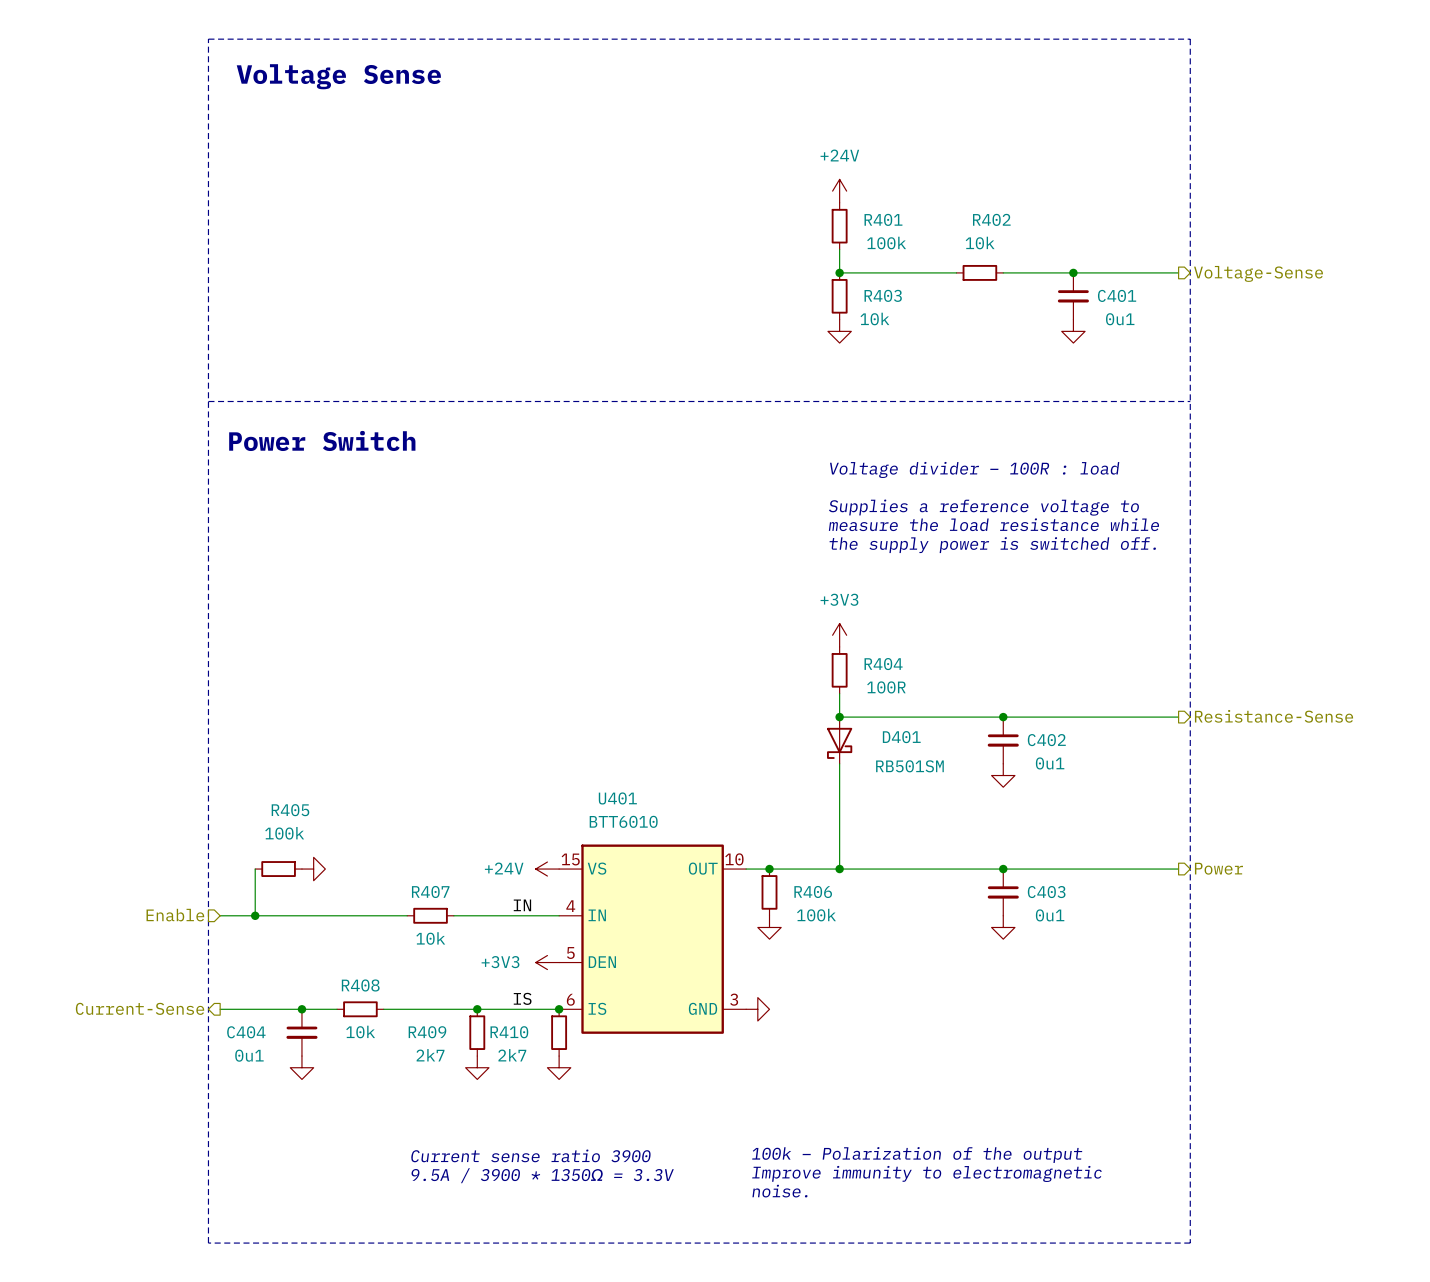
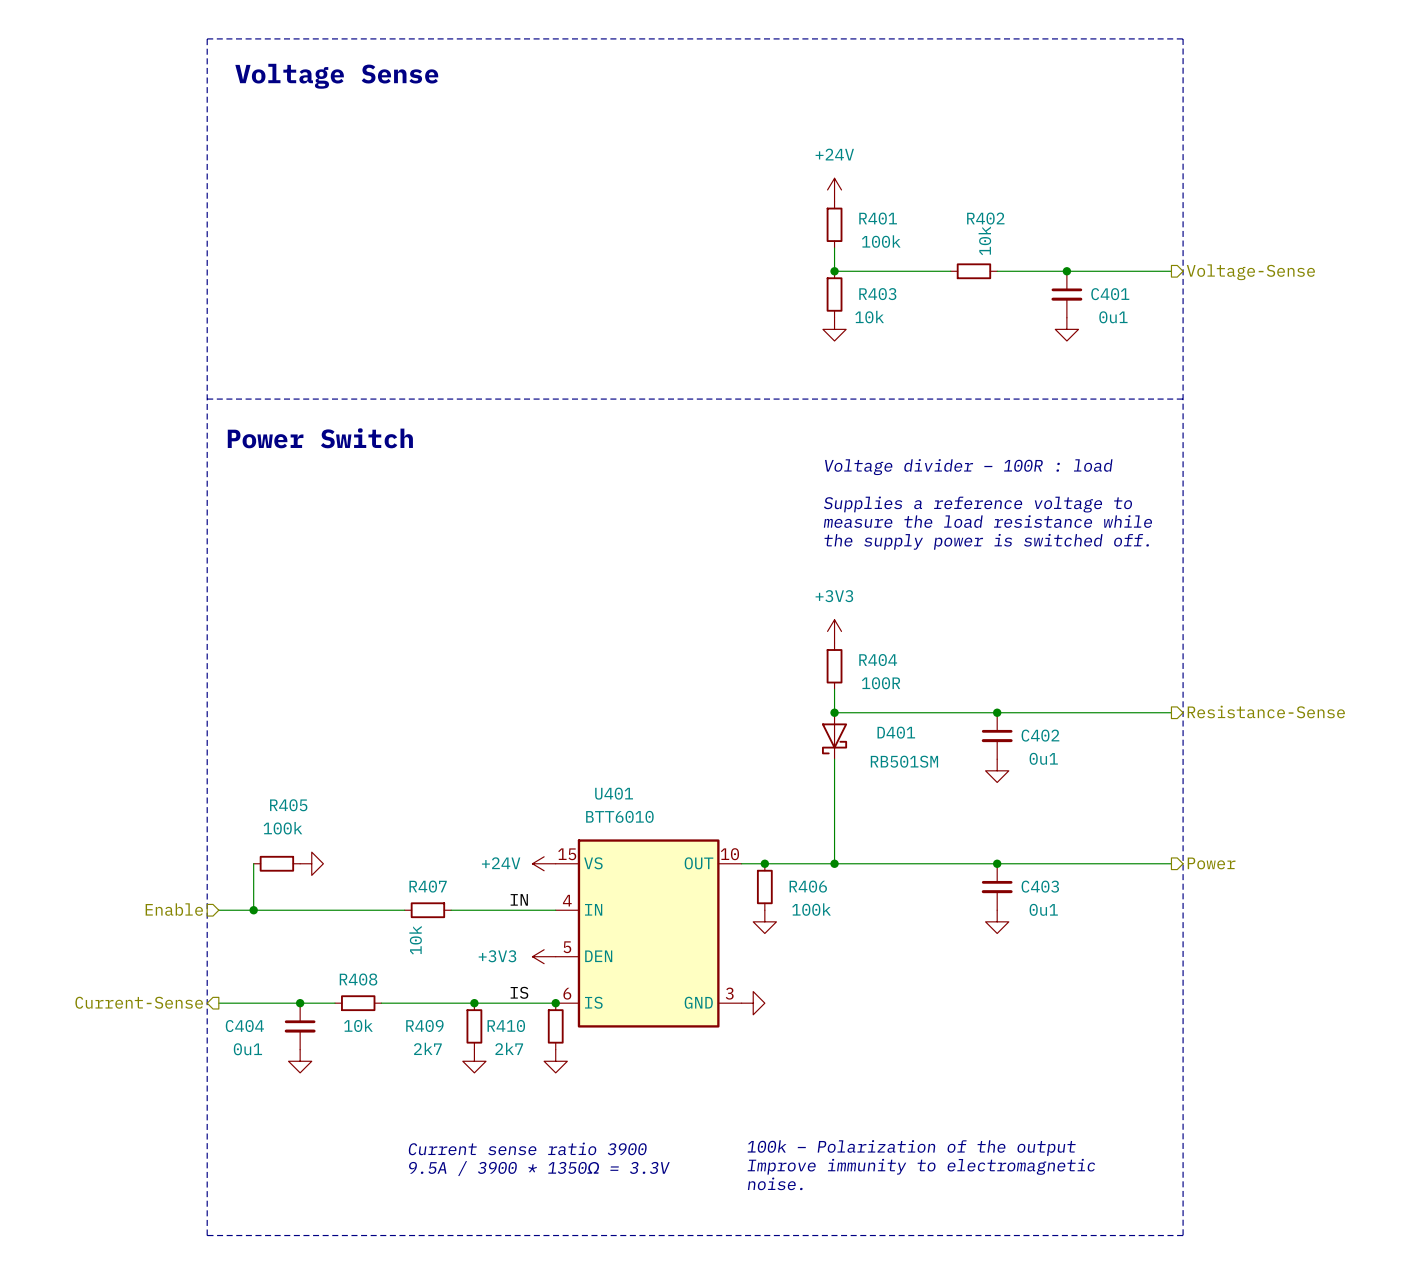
R402 value rotation: 0° (980, 243) -> 90° counterclockwise (984, 240)
R407 value rotation: 0° (430, 938) -> 90° counterclockwise (415, 940)

